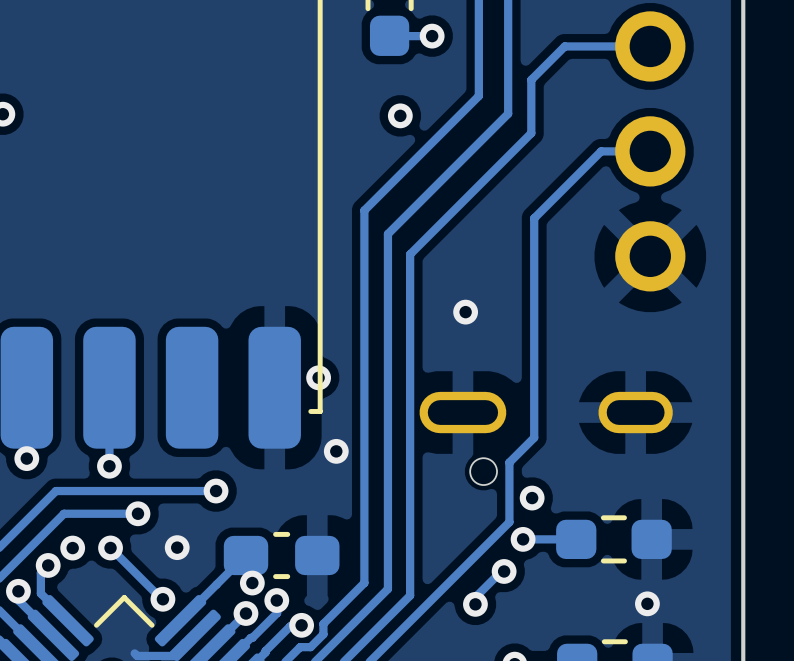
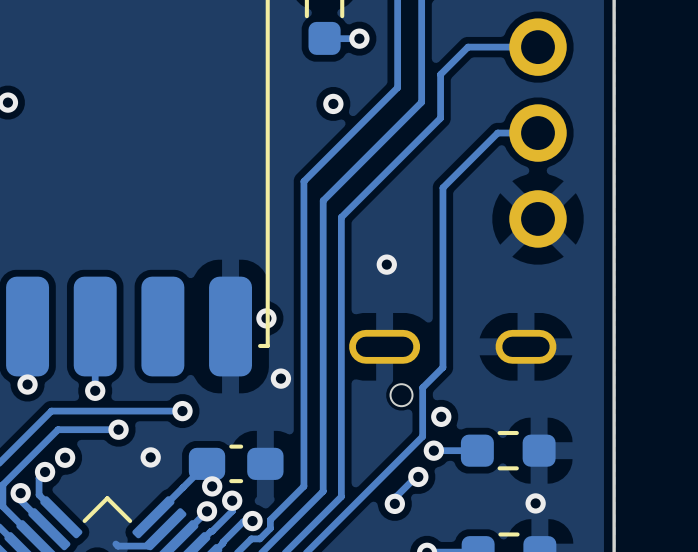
track: (110, 547) (162, 599) -> none
via: (110, 547) -> none
via: (162, 599) -> none

